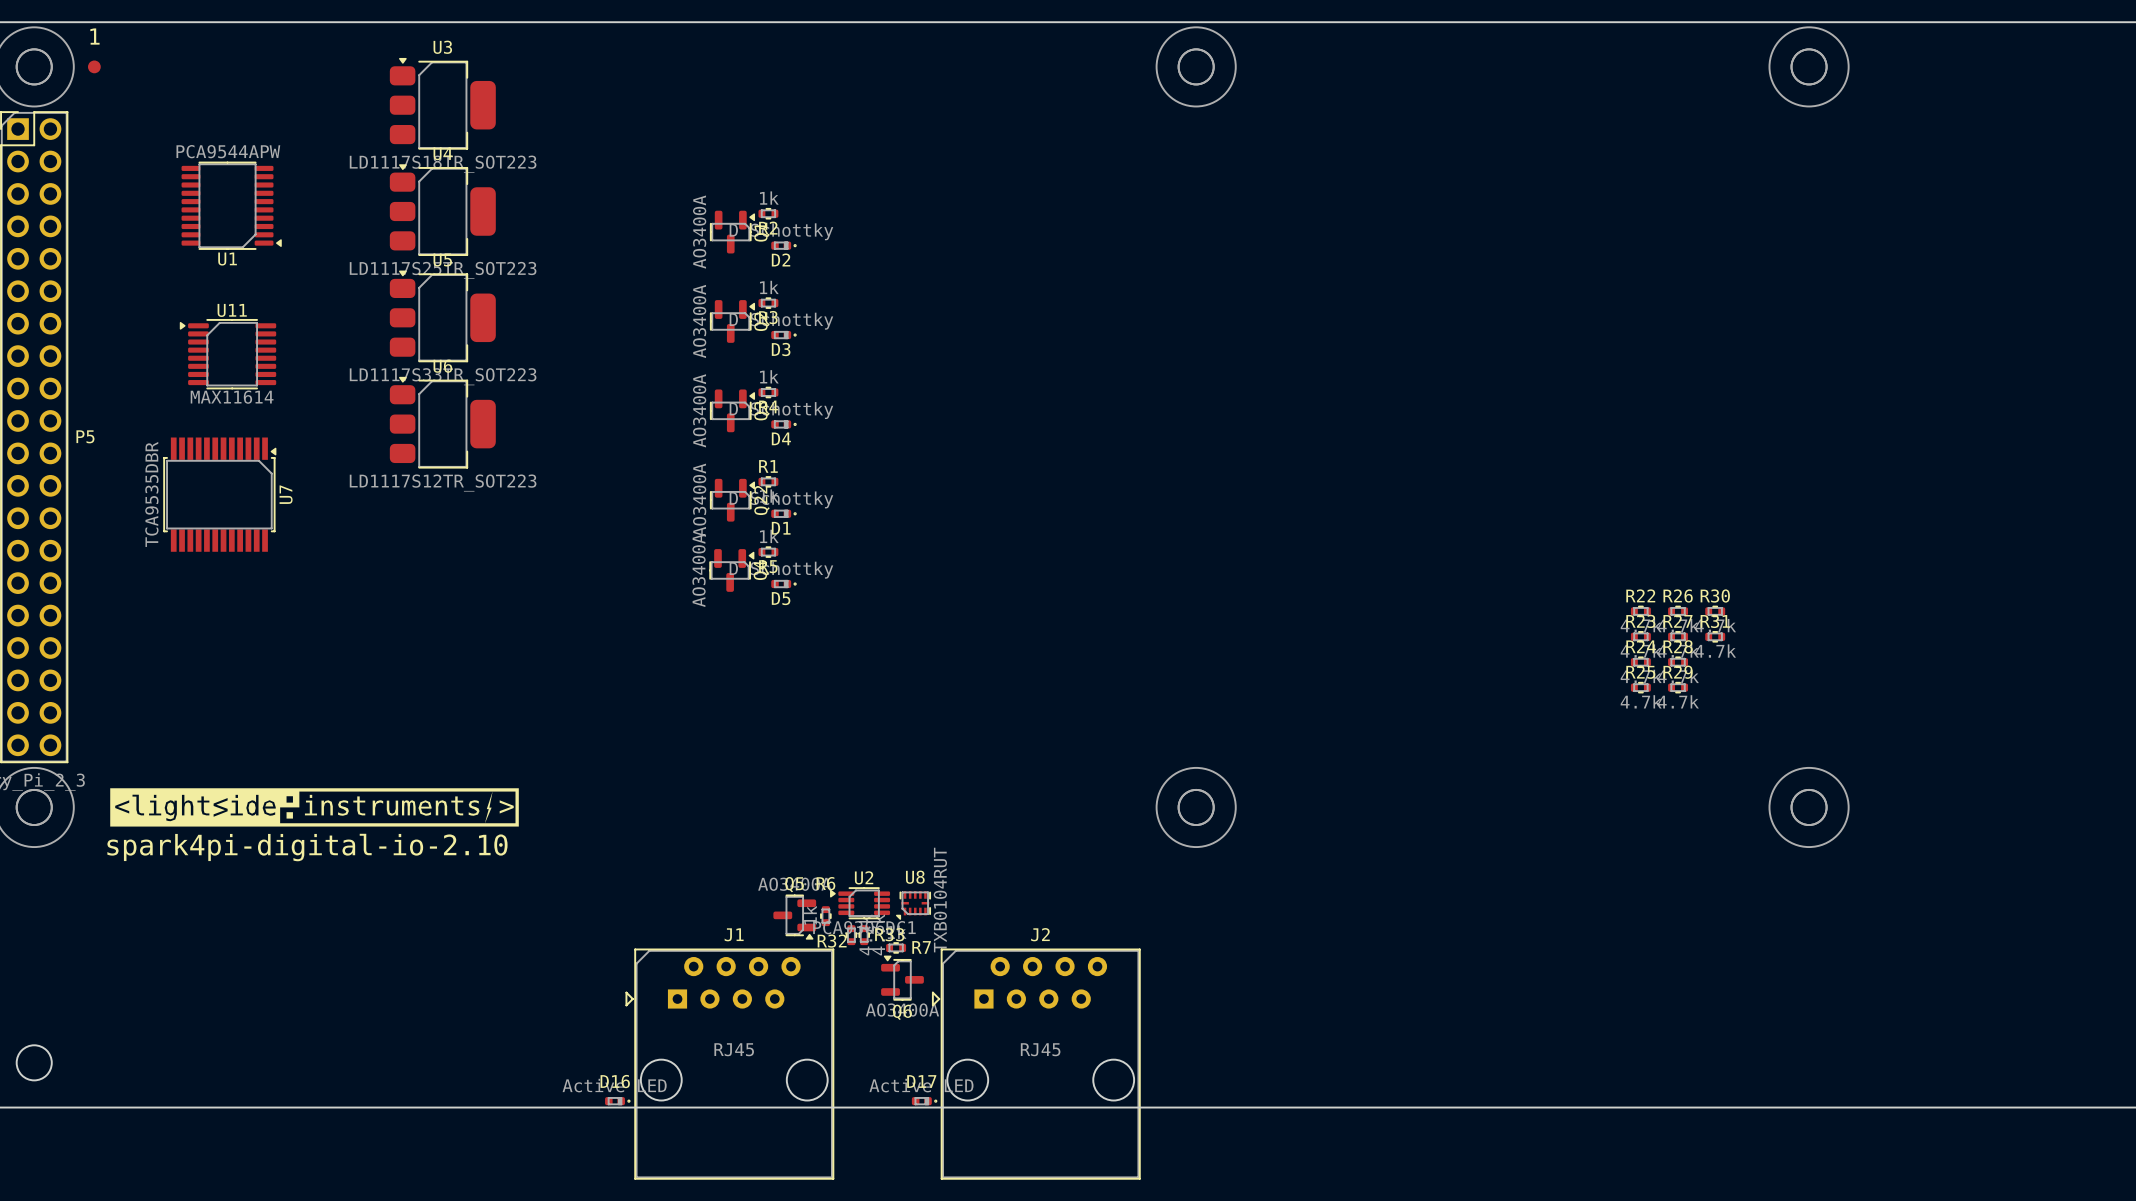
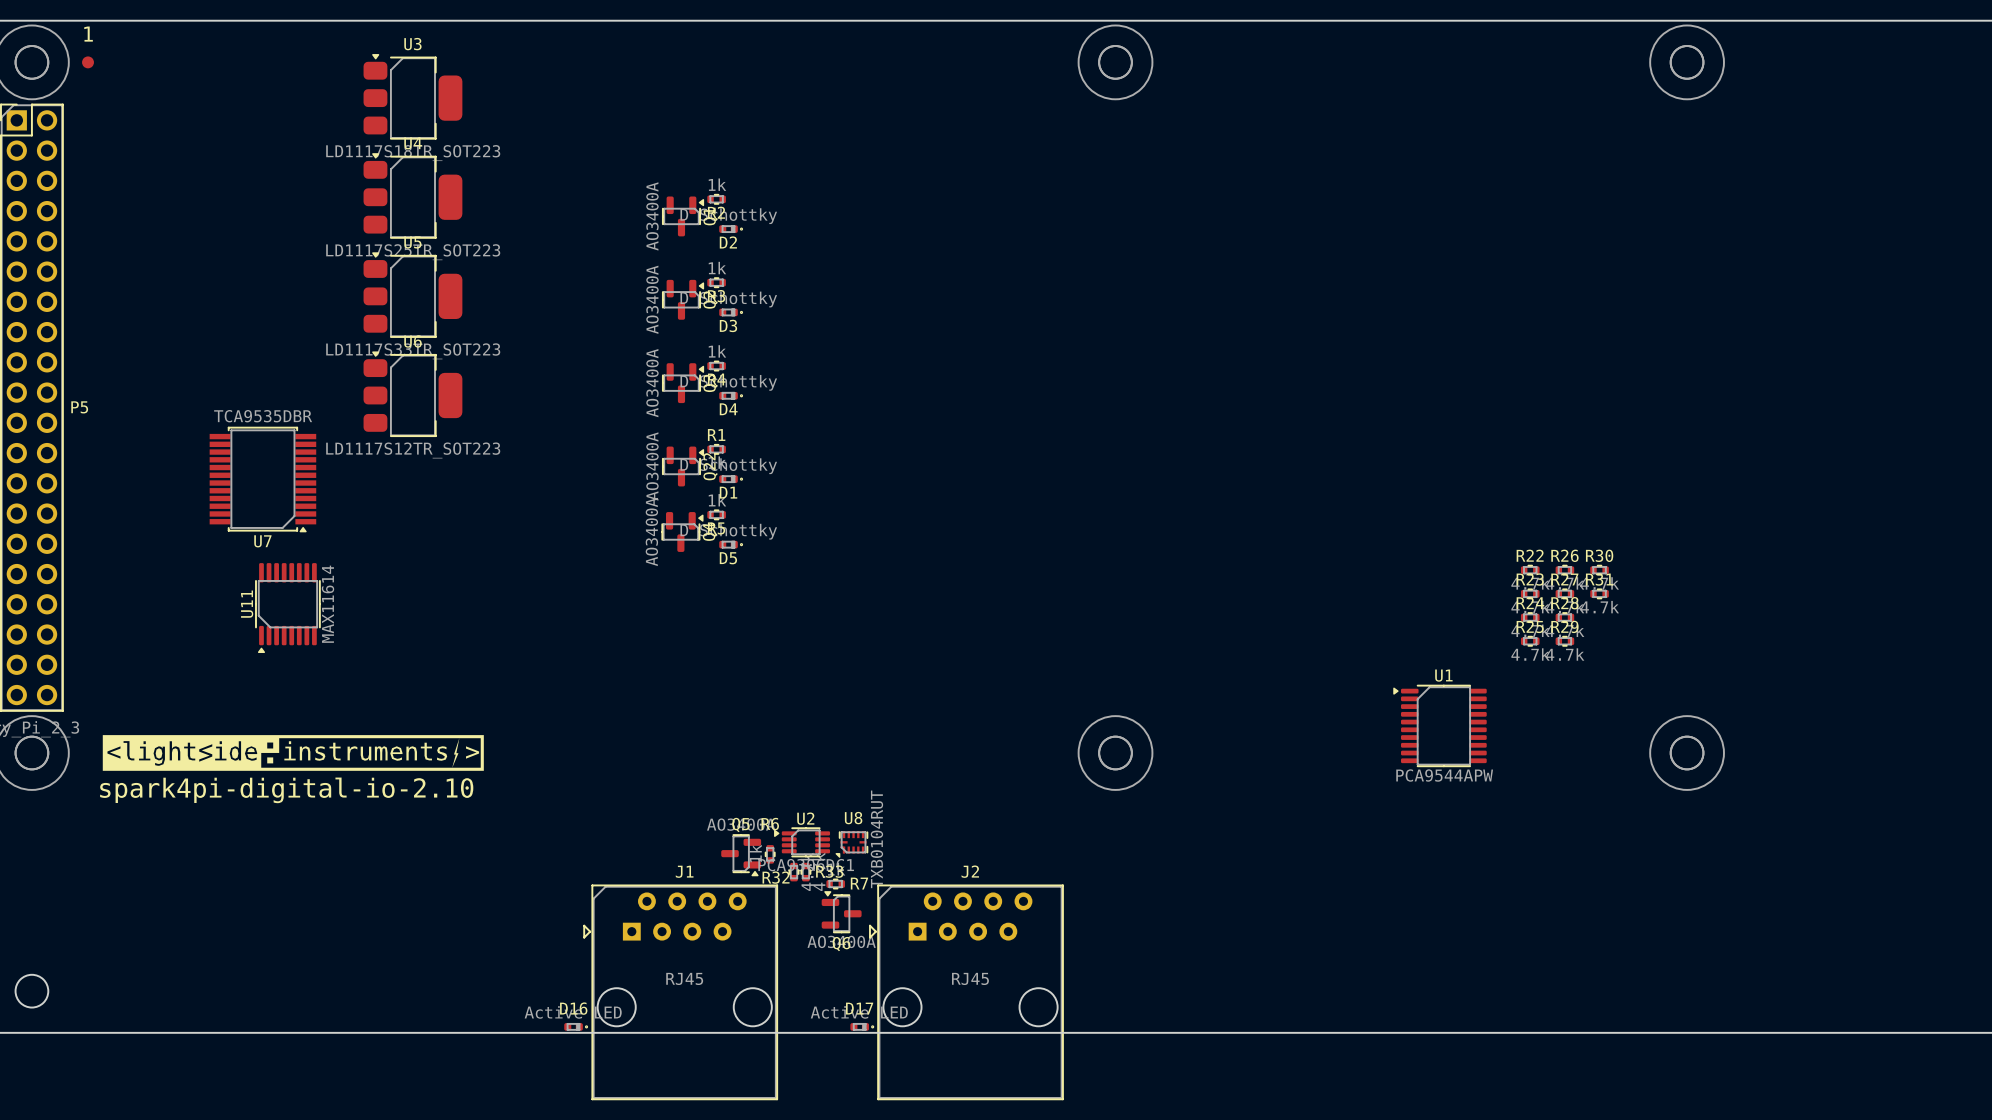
U1 rotation: 0° (231, 205) -> 180° (1439, 725)
U1 position: (231, 205) -> (1439, 725)
U11 rotation: 0° (228, 354) -> 90° counterclockwise (287, 608)
U11 position: (228, 354) -> (287, 608)
U7 rotation: 0° (219, 494) -> 90° clockwise (262, 479)

